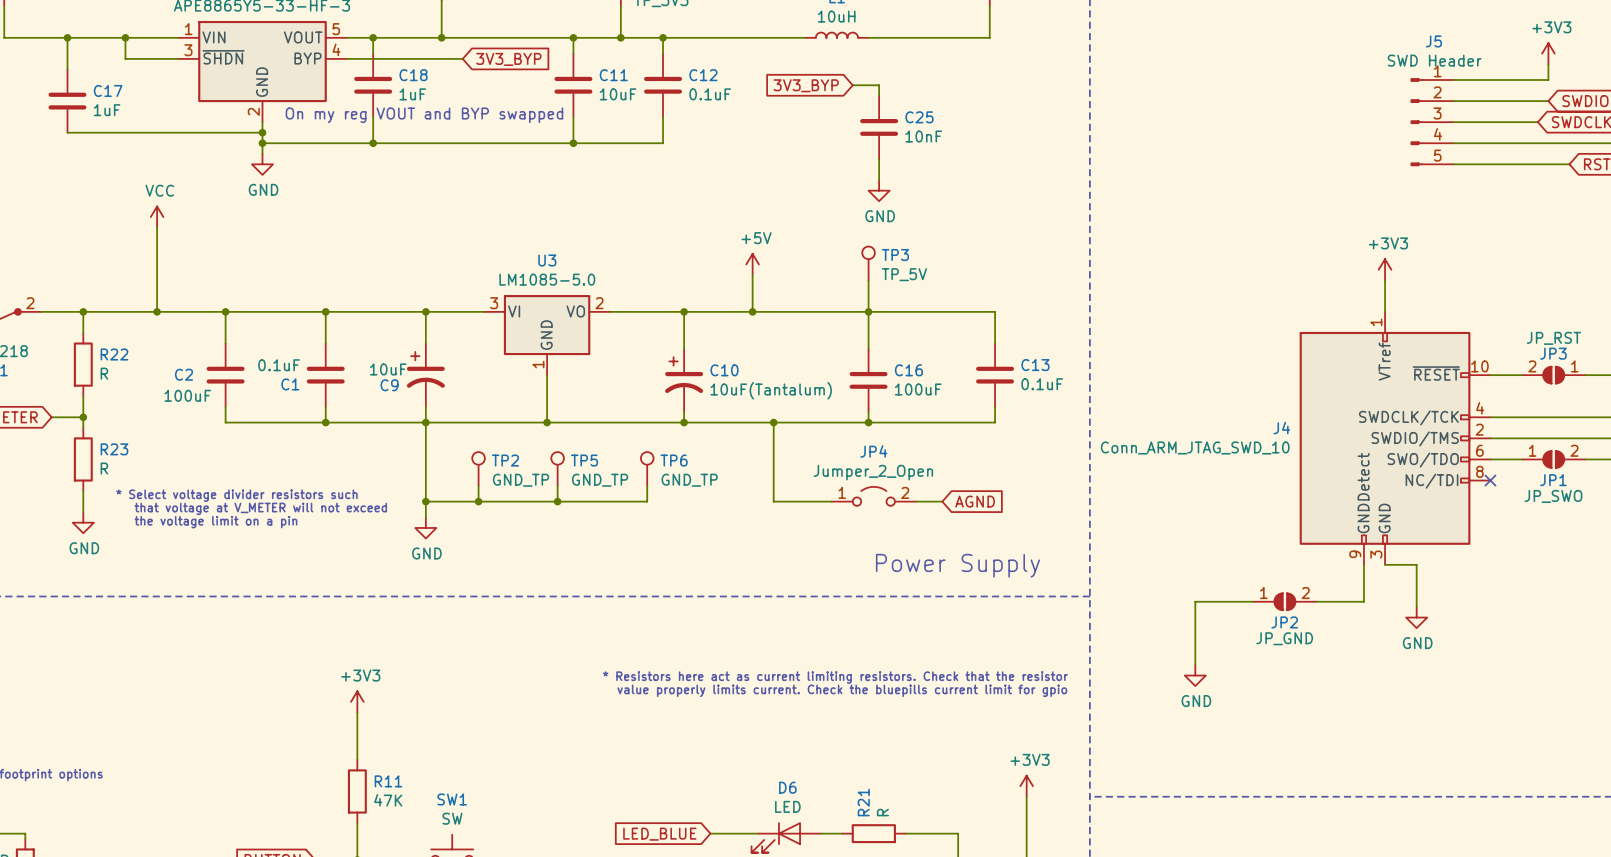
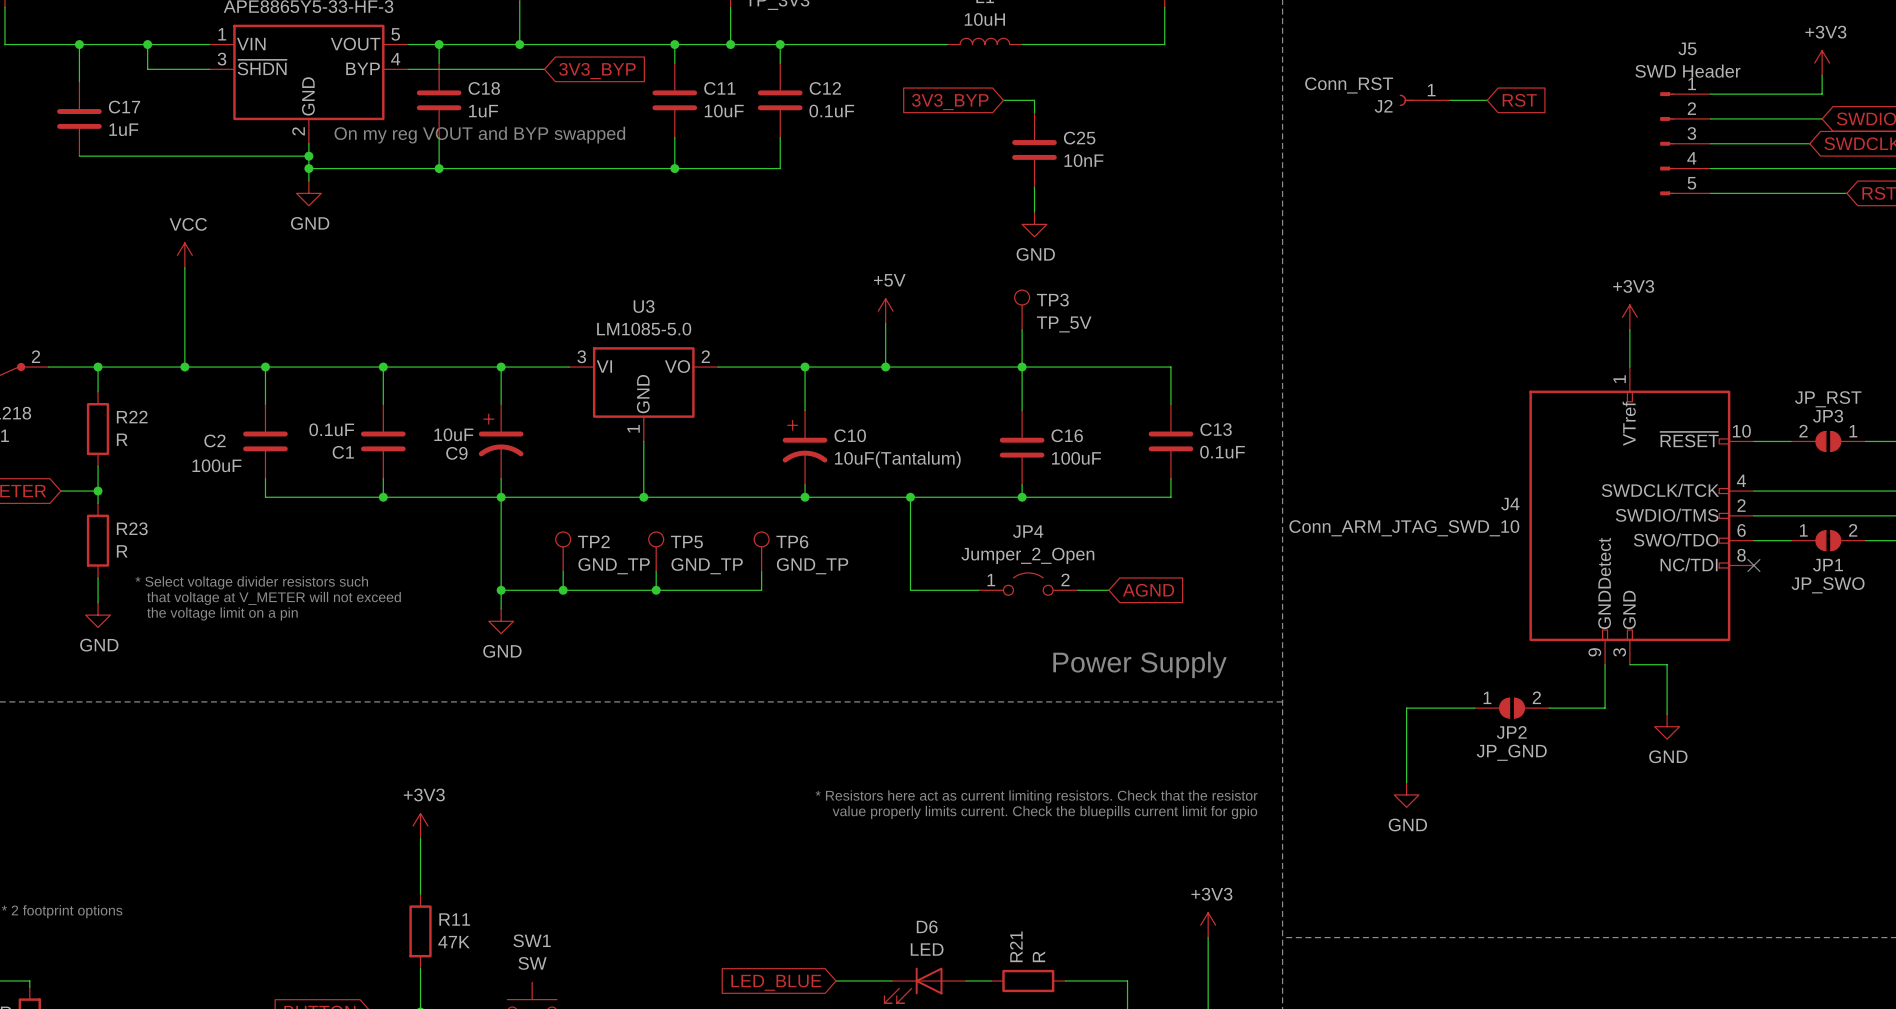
J2: none -> Conn_RST (1424, 100)
wire: none -> (1450, 100) (1487, 100)
global label: none -> RST (1519, 100)

